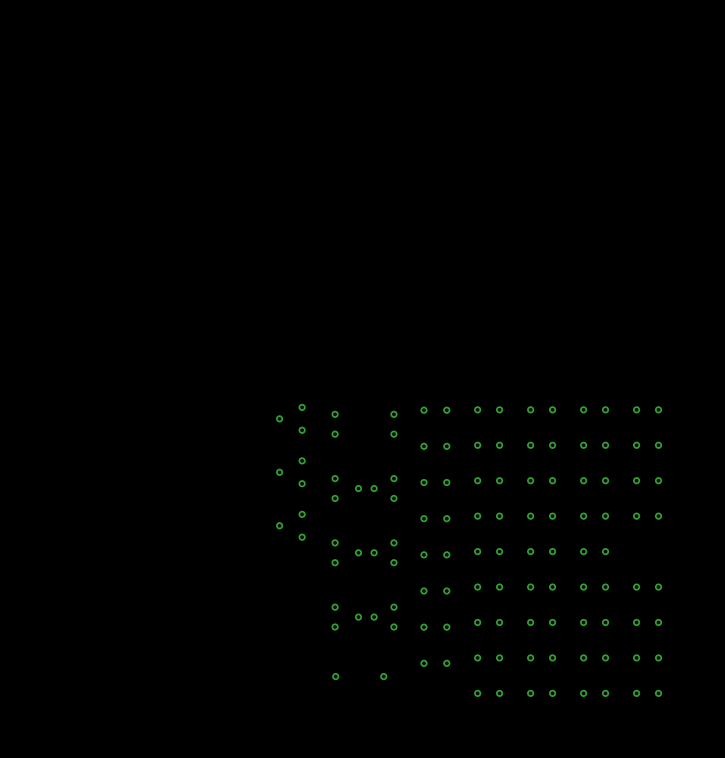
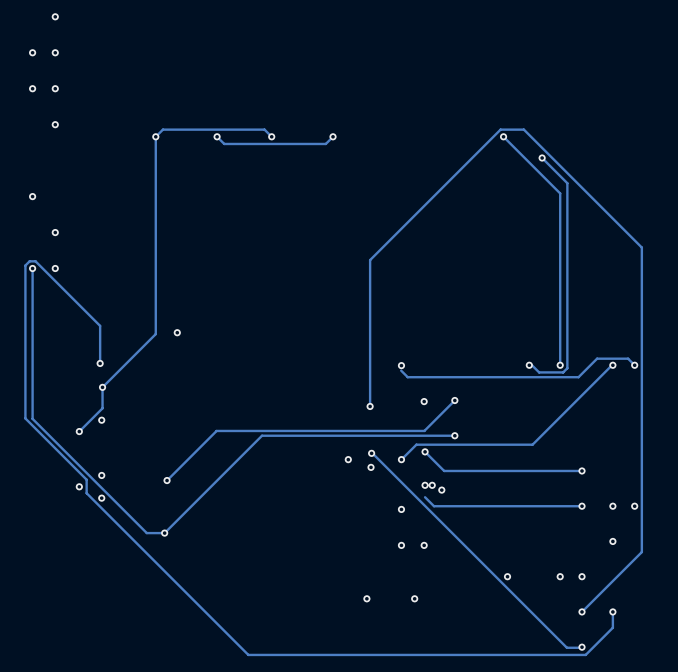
via: none -> (55, 16)
via: none -> (32, 52)
via: none -> (55, 52)
via: none -> (32, 88)
via: none -> (55, 88)
via: none -> (55, 124)
via: none -> (155, 136)
via: none -> (217, 136)
track: none -> (271, 136) (264, 129) (162, 129) (155, 136) (155, 334) (102, 387) (102, 408) (79, 431)
via: none -> (271, 136)
track: none -> (333, 136) (325, 143) (224, 143) (217, 136)
via: none -> (333, 136)
track: none -> (503, 136) (560, 193) (560, 365)
via: none -> (503, 136)
track: none -> (542, 158) (567, 183) (567, 368) (563, 372) (539, 372) (530, 363)
via: none -> (542, 158)
via: none -> (32, 196)
via: none -> (55, 232)
track: none -> (32, 268) (32, 418) (146, 533) (164, 533) (262, 435) (454, 435)
via: none -> (32, 268)
via: none -> (55, 268)
via: none -> (177, 332)
via: (302, 407) -> none
track: none -> (100, 363) (100, 325) (35, 261) (29, 261) (25, 265) (25, 418) (86, 479) (86, 493) (248, 654) (585, 654) (612, 627) (612, 611)
via: none -> (100, 363)
via: (477, 409) -> none
via: (499, 409) -> none
via: (530, 409) -> none
via: (605, 409) -> none
track: none -> (634, 365) (628, 358) (597, 358) (578, 377) (407, 377) (401, 370)
via: (446, 410) -> none
track: none -> (611, 365) (532, 444) (416, 444) (401, 459)
via: (335, 414) -> none
via: (393, 414) -> none
via: (279, 418) -> none
via: (302, 430) -> none
via: none -> (102, 387)
via: (335, 434) -> none
via: (393, 434) -> none
track: none -> (454, 400) (424, 430) (216, 430) (167, 480)
via: (499, 445) -> none
via: (530, 445) -> none
via: (552, 445) -> none
via: (583, 445) -> none
via: (605, 445) -> none
via: (636, 445) -> none
via: (658, 445) -> none
via: (423, 446) -> none
track: none -> (370, 406) (370, 260) (500, 129) (523, 129) (641, 247) (641, 552) (582, 611)
via: none -> (370, 406)
via: (302, 460) -> none
via: none -> (101, 420)
via: (279, 472) -> none
via: none -> (79, 431)
via: (335, 478) -> none
via: (393, 478) -> none
via: (499, 480) -> none
via: (530, 480) -> none
via: (552, 480) -> none
via: (583, 480) -> none
via: (605, 480) -> none
via: (636, 480) -> none
via: (658, 480) -> none
via: (423, 482) -> none
via: (446, 482) -> none
via: (302, 483) -> none
via: (358, 488) -> none
via: (374, 488) -> none
track: none -> (371, 451) (566, 647) (582, 647)
track: none -> (425, 451) (444, 470) (582, 470)
via: none -> (425, 451)
via: (335, 498) -> none
via: none -> (348, 459)
via: none -> (401, 459)
via: none -> (371, 467)
via: (302, 514) -> none
via: (477, 516) -> none
via: (499, 516) -> none
via: (530, 516) -> none
via: (552, 516) -> none
via: (583, 516) -> none
via: (636, 516) -> none
via: (658, 516) -> none
via: (423, 518) -> none
via: (446, 518) -> none
via: none -> (101, 475)
via: none -> (167, 480)
via: (279, 525) -> none
via: none -> (425, 485)
via: none -> (432, 485)
via: none -> (79, 486)
via: none -> (441, 490)
via: (302, 537) -> none
via: (335, 542) -> none
via: (393, 542) -> none
track: none -> (425, 497) (434, 506) (582, 506)
via: none -> (101, 498)
via: (477, 551) -> none
via: (499, 551) -> none
via: (530, 551) -> none
via: (552, 551) -> none
via: (583, 551) -> none
via: none -> (612, 506)
via: none -> (634, 506)
via: (358, 552) -> none
via: (374, 552) -> none
via: (446, 554) -> none
via: (335, 562) -> none
via: (393, 562) -> none
via: none -> (164, 533)
via: (477, 587) -> none
via: (499, 587) -> none
via: (530, 587) -> none
via: (552, 587) -> none
via: (583, 587) -> none
via: (605, 587) -> none
via: (658, 587) -> none
via: (335, 607) -> none
via: (393, 607) -> none
via: (358, 617) -> none
via: (374, 617) -> none
via: (477, 622) -> none
via: (499, 622) -> none
via: (552, 622) -> none
via: (636, 622) -> none
via: (658, 622) -> none
via: (335, 626) -> none
via: (393, 626) -> none
via: (423, 627) -> none
via: (446, 627) -> none
via: none -> (366, 598)
via: none -> (414, 598)
via: (477, 657) -> none
via: (499, 657) -> none
via: (530, 657) -> none
via: (552, 657) -> none
via: (583, 657) -> none
via: (658, 657) -> none
via: (423, 663) -> none
via: (446, 663) -> none
via: (335, 676) -> none
via: (383, 676) -> none
via: (477, 693) -> none
via: (499, 693) -> none
via: (530, 693) -> none
via: (552, 693) -> none
via: (583, 693) -> none
via: (636, 693) -> none
via: (658, 693) -> none

